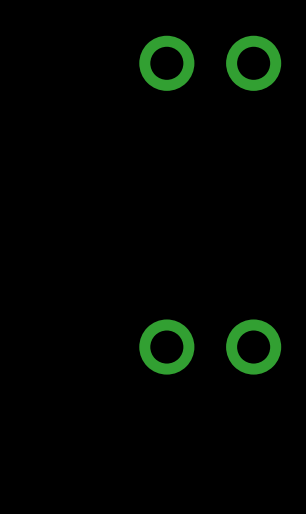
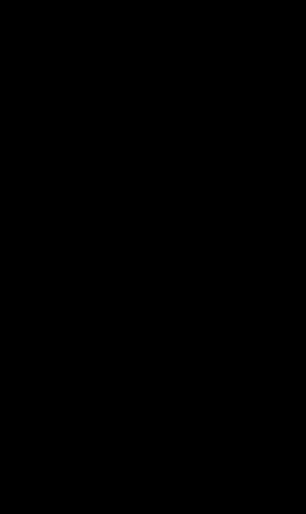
part: (210, 63) -> none
part: (210, 347) -> none

